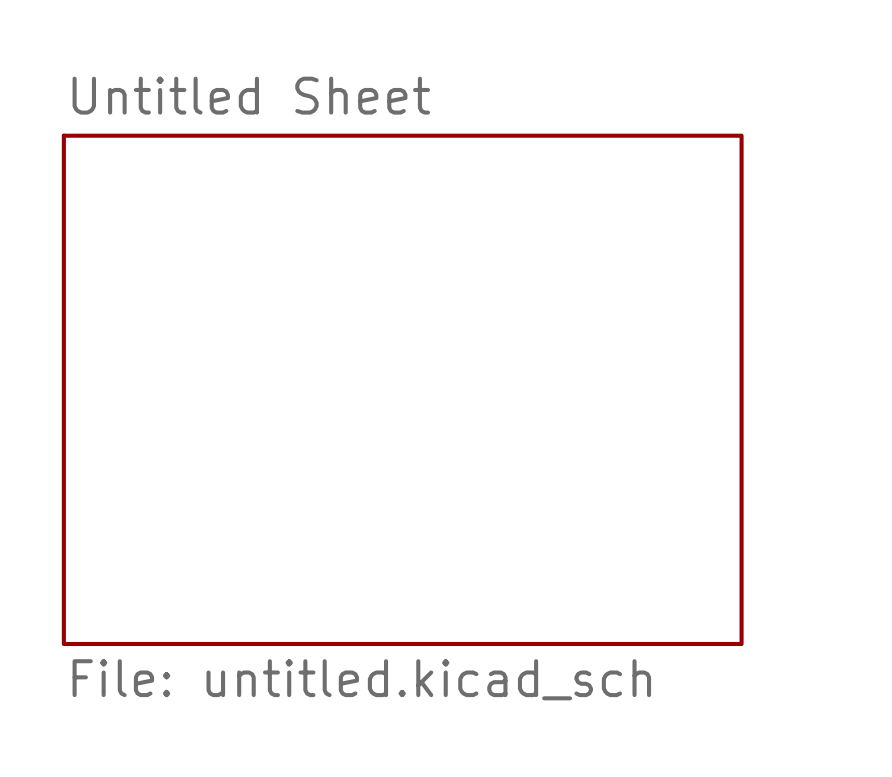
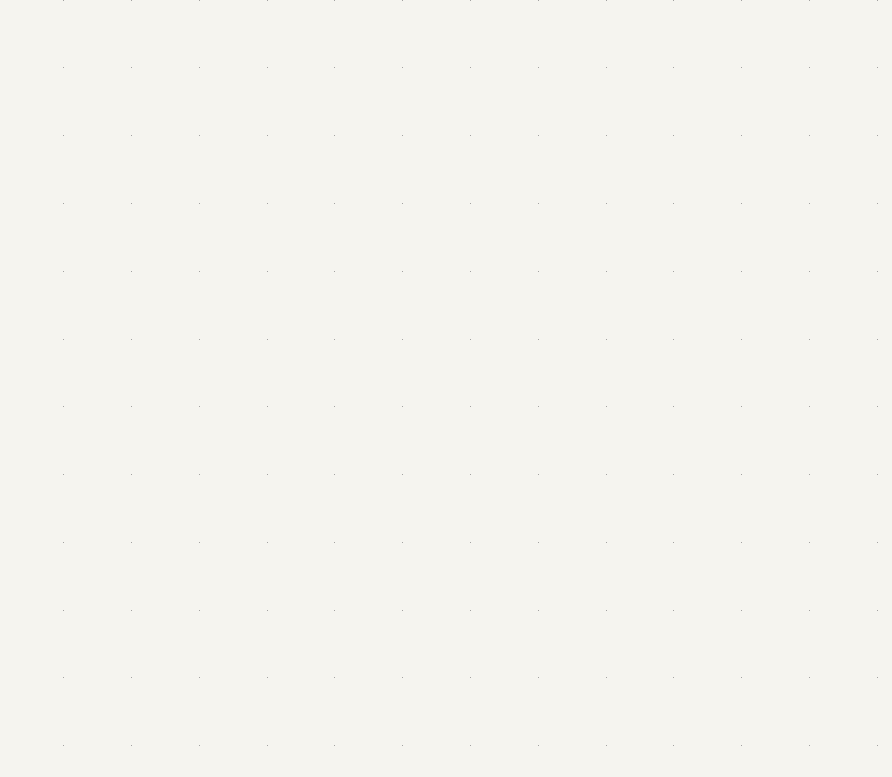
sheet Untitled Sheet: File: untitled.kicad_sch (402, 389) -> none

